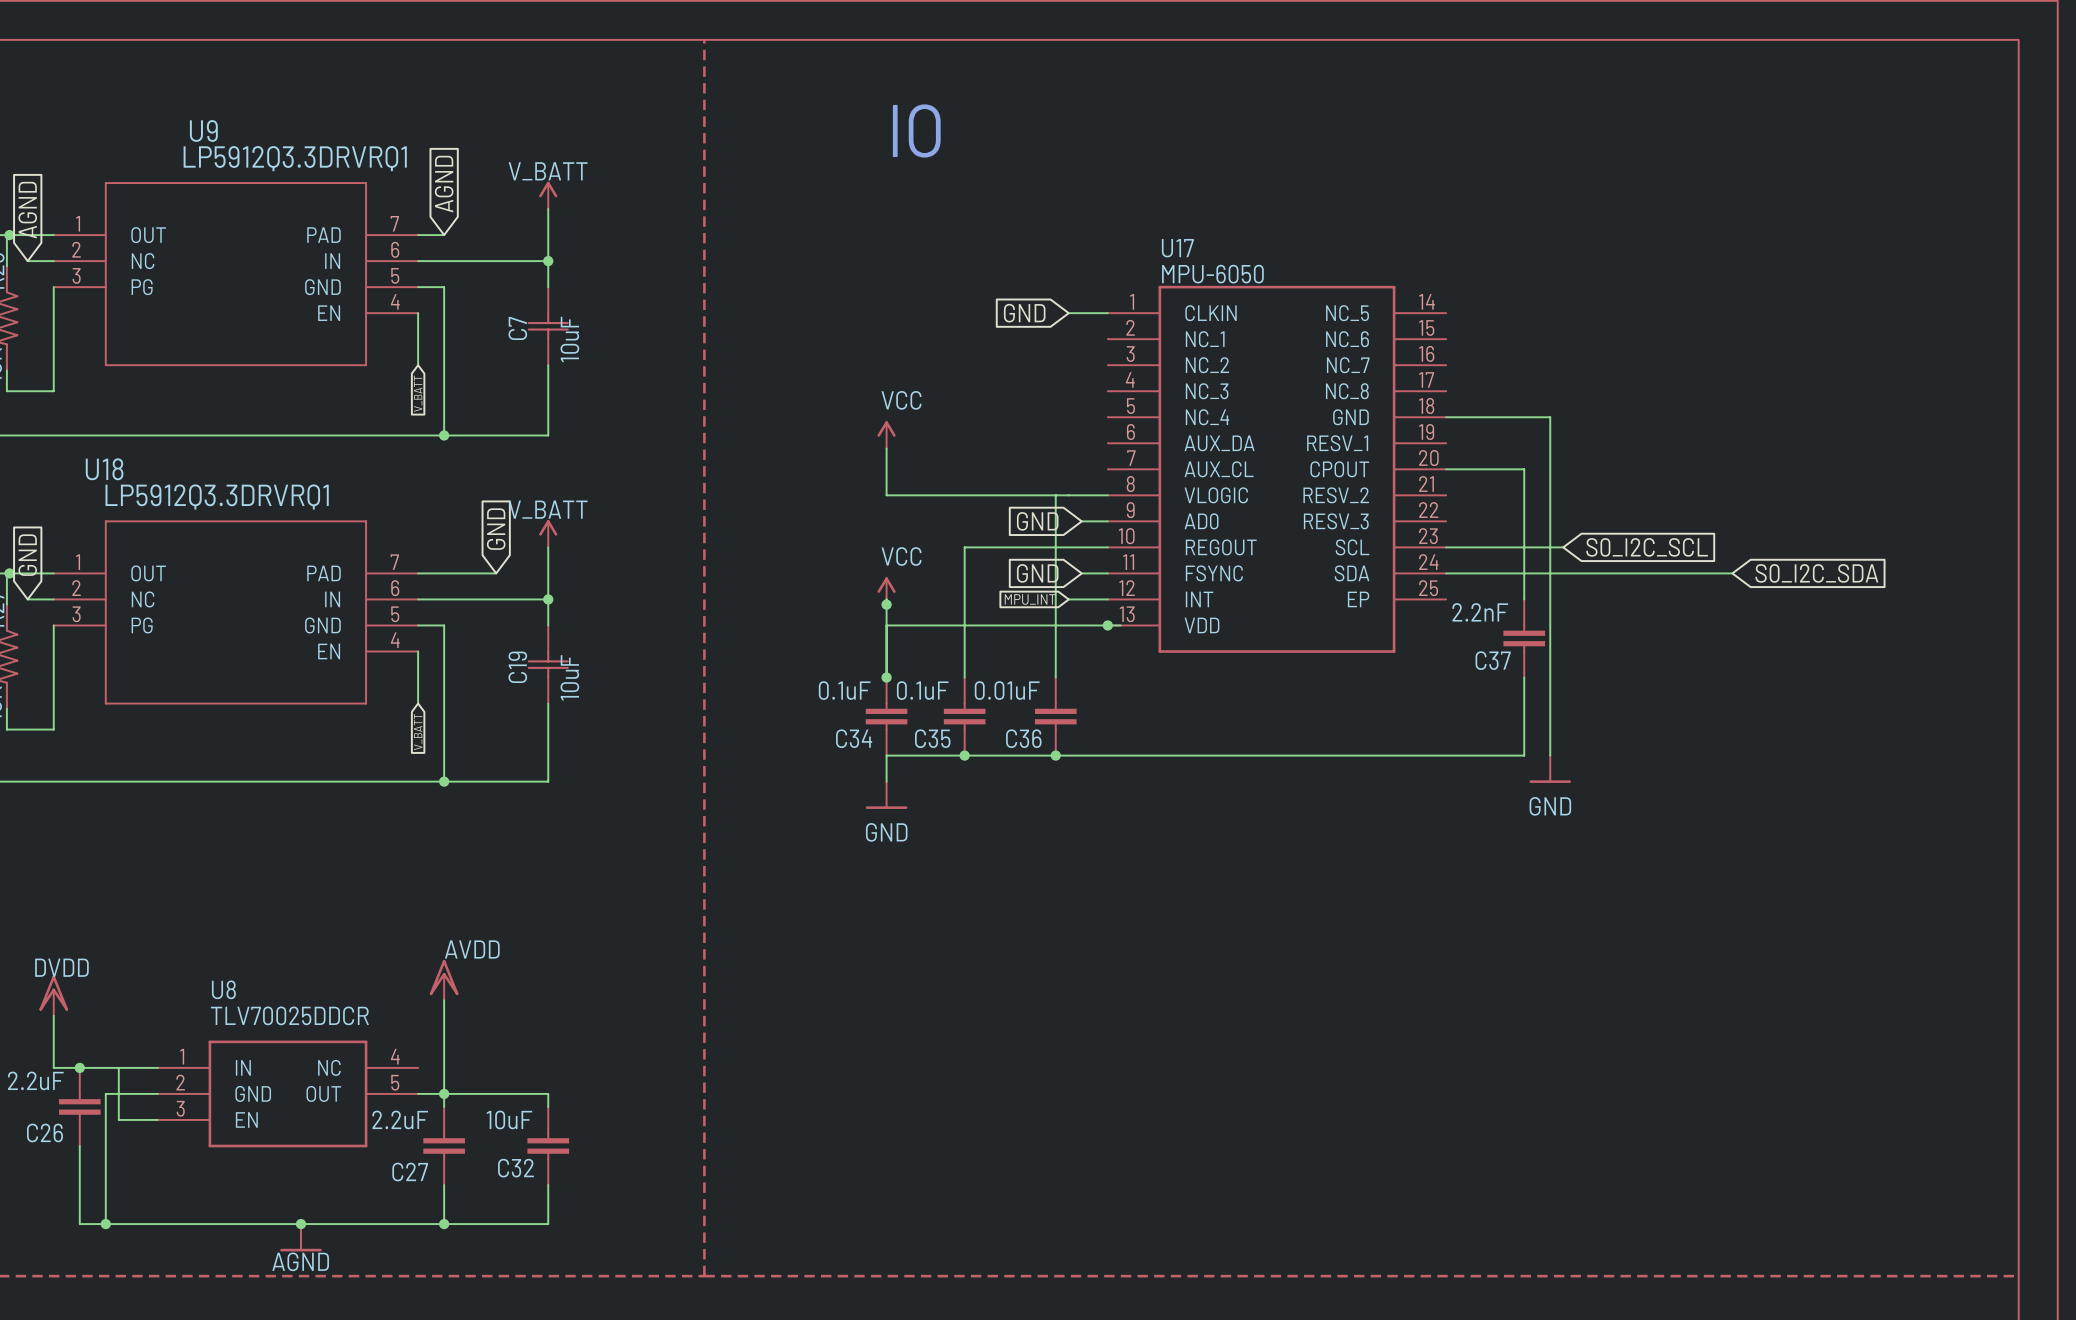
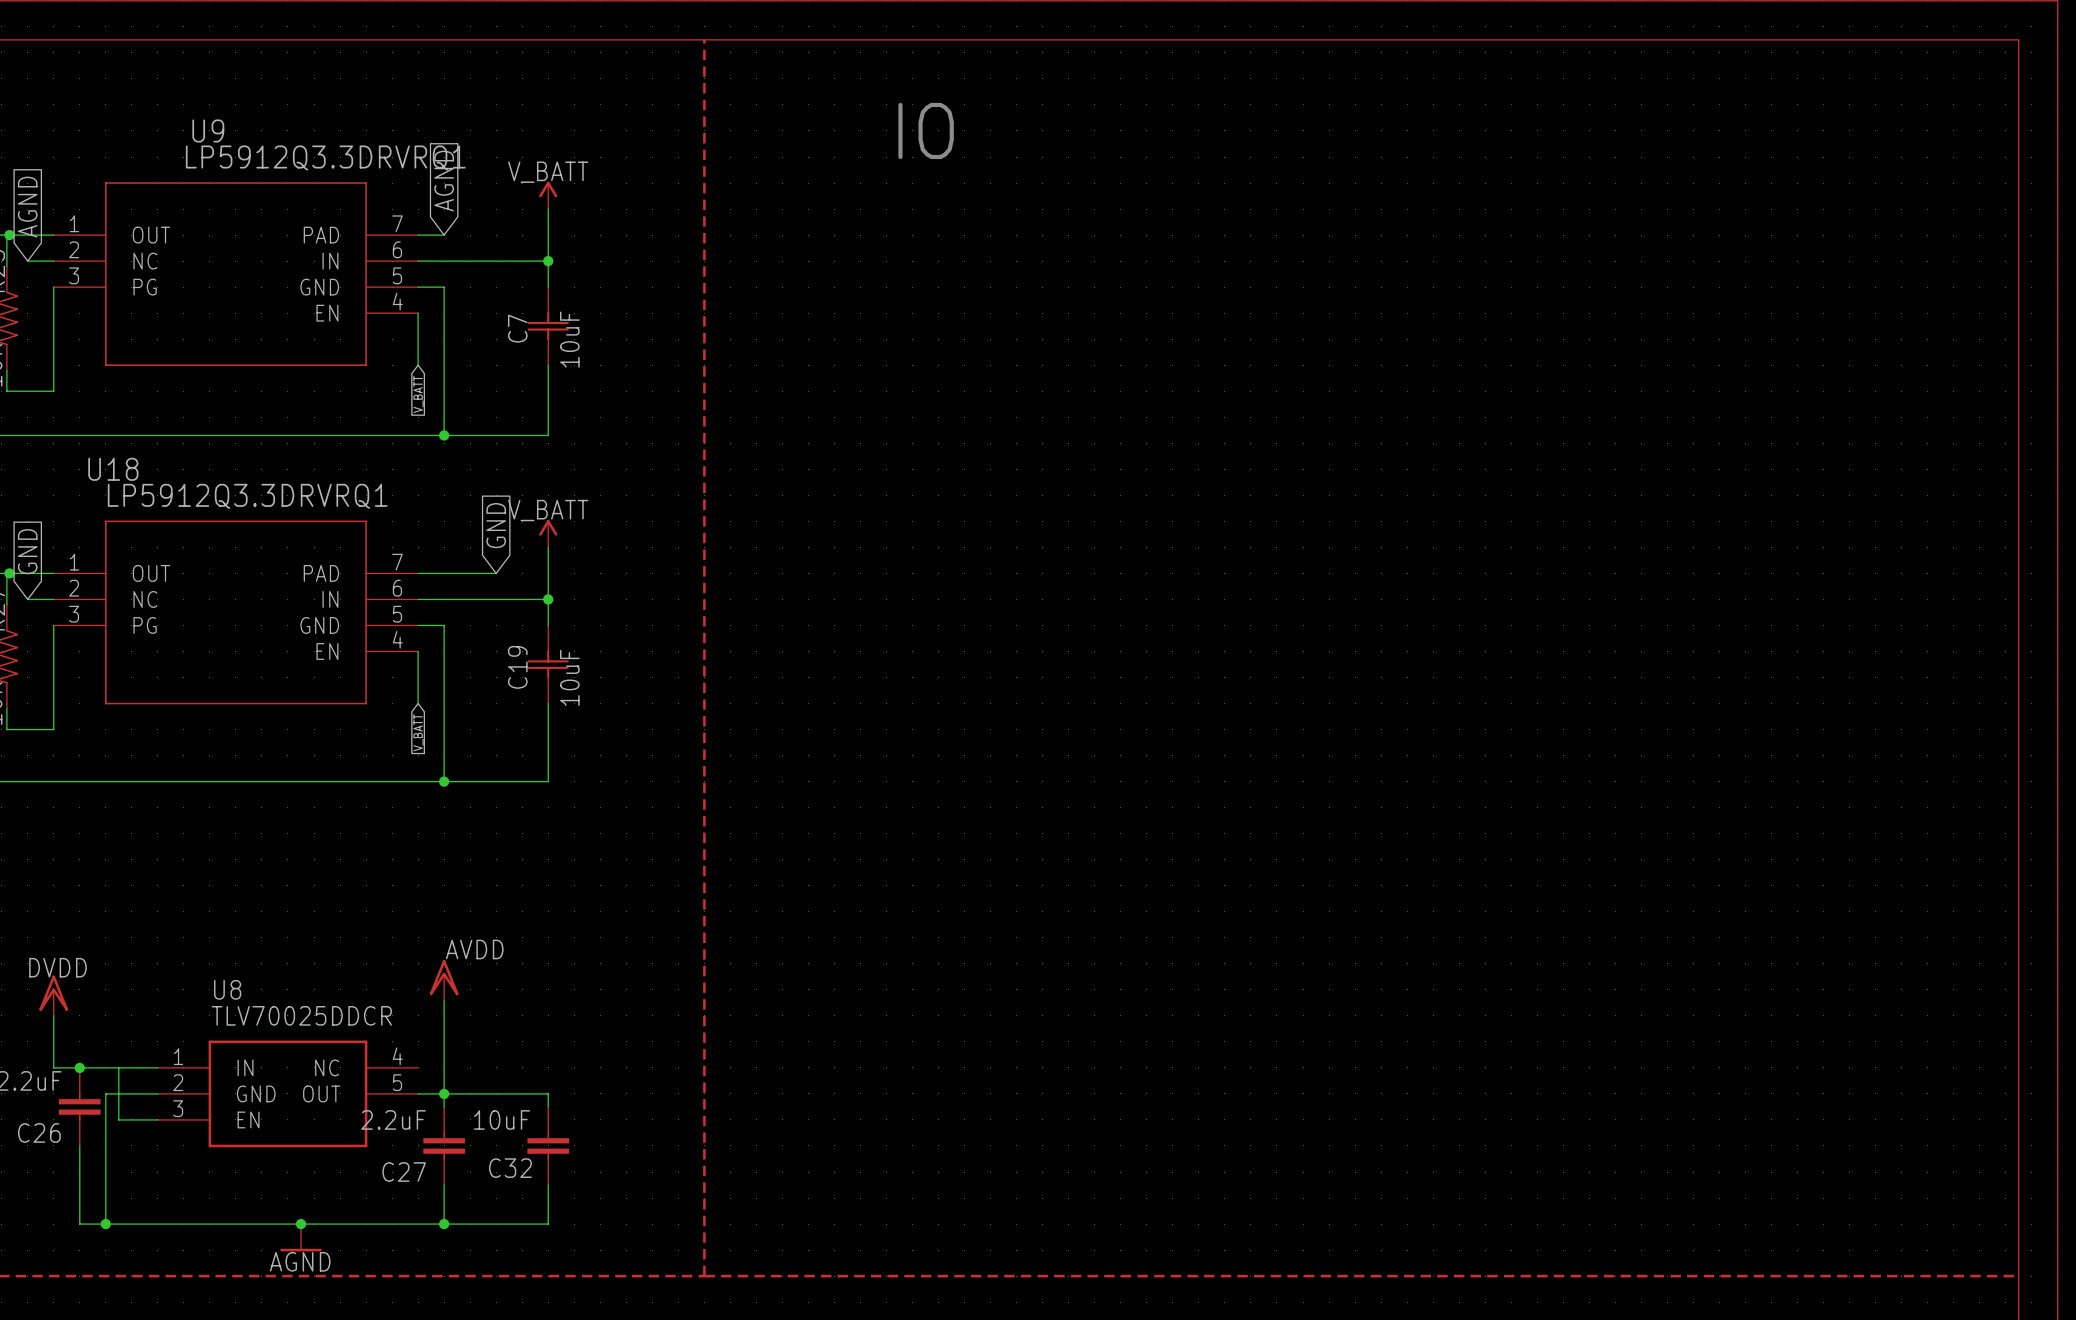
global label: GND (1024, 313) -> none
wire: (1068, 313) (1107, 313) -> none
wire: (1446, 417) (1550, 417) (1550, 755) -> none
power symbol: VCC (886, 434) -> none
wire: (886, 448) (886, 495) (1107, 495) -> none
U17: MPU-6050 (1276, 469) -> none
wire: (1446, 469) (1524, 469) (1524, 599) -> none
wire: (1055, 495) (1055, 677) -> none
global label: GND (1037, 521) -> none
wire: (1081, 521) (1107, 521) -> none
wire: (1107, 547) (964, 547) (964, 677) -> none
wire: (1446, 547) (1563, 547) -> none
global label: S0_I2C_SCL (1647, 547) -> none
global label: GND (1037, 573) -> none
wire: (1081, 573) (1107, 573) -> none
wire: (1446, 573) (1732, 573) -> none
global label: S0_I2C_SDA (1816, 573) -> none
power symbol: VCC (886, 590) -> none
wire: (886, 599) (886, 677) -> none
global label: MPU_INT (1030, 599) -> none
wire: (1068, 599) (1107, 599) -> none
junction: (886, 604) -> none
wire: (886, 625) (1120, 625) -> none
junction: (1107, 625) -> none
C37: 2.2nF (1524, 638) -> none
junction: (886, 677) -> none
wire: (1524, 677) (1524, 755) (886, 755) (886, 781) -> none
C34: 0.1uF (886, 716) -> none
C35: 0.1uF (964, 716) -> none
C36: 0.01uF (1055, 716) -> none
junction: (964, 755) -> none
junction: (1055, 755) -> none
power symbol: GND (1550, 769) -> none
power symbol: GND (886, 795) -> none

